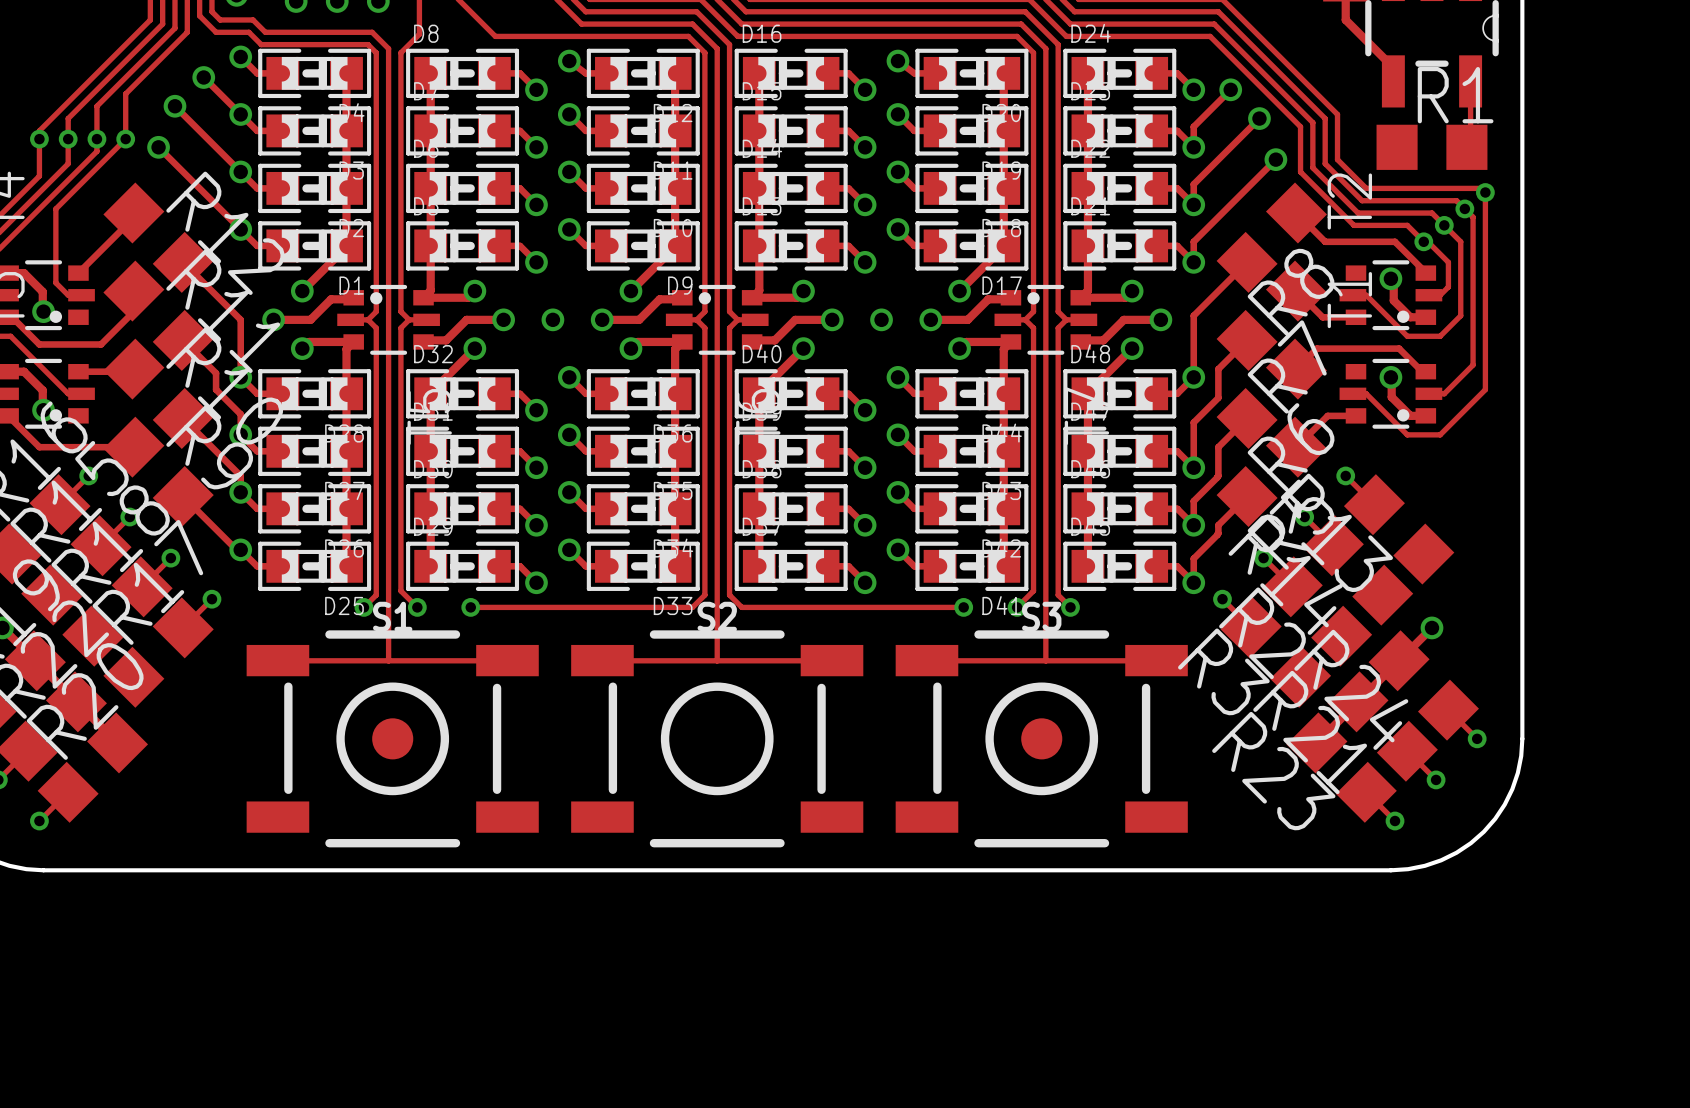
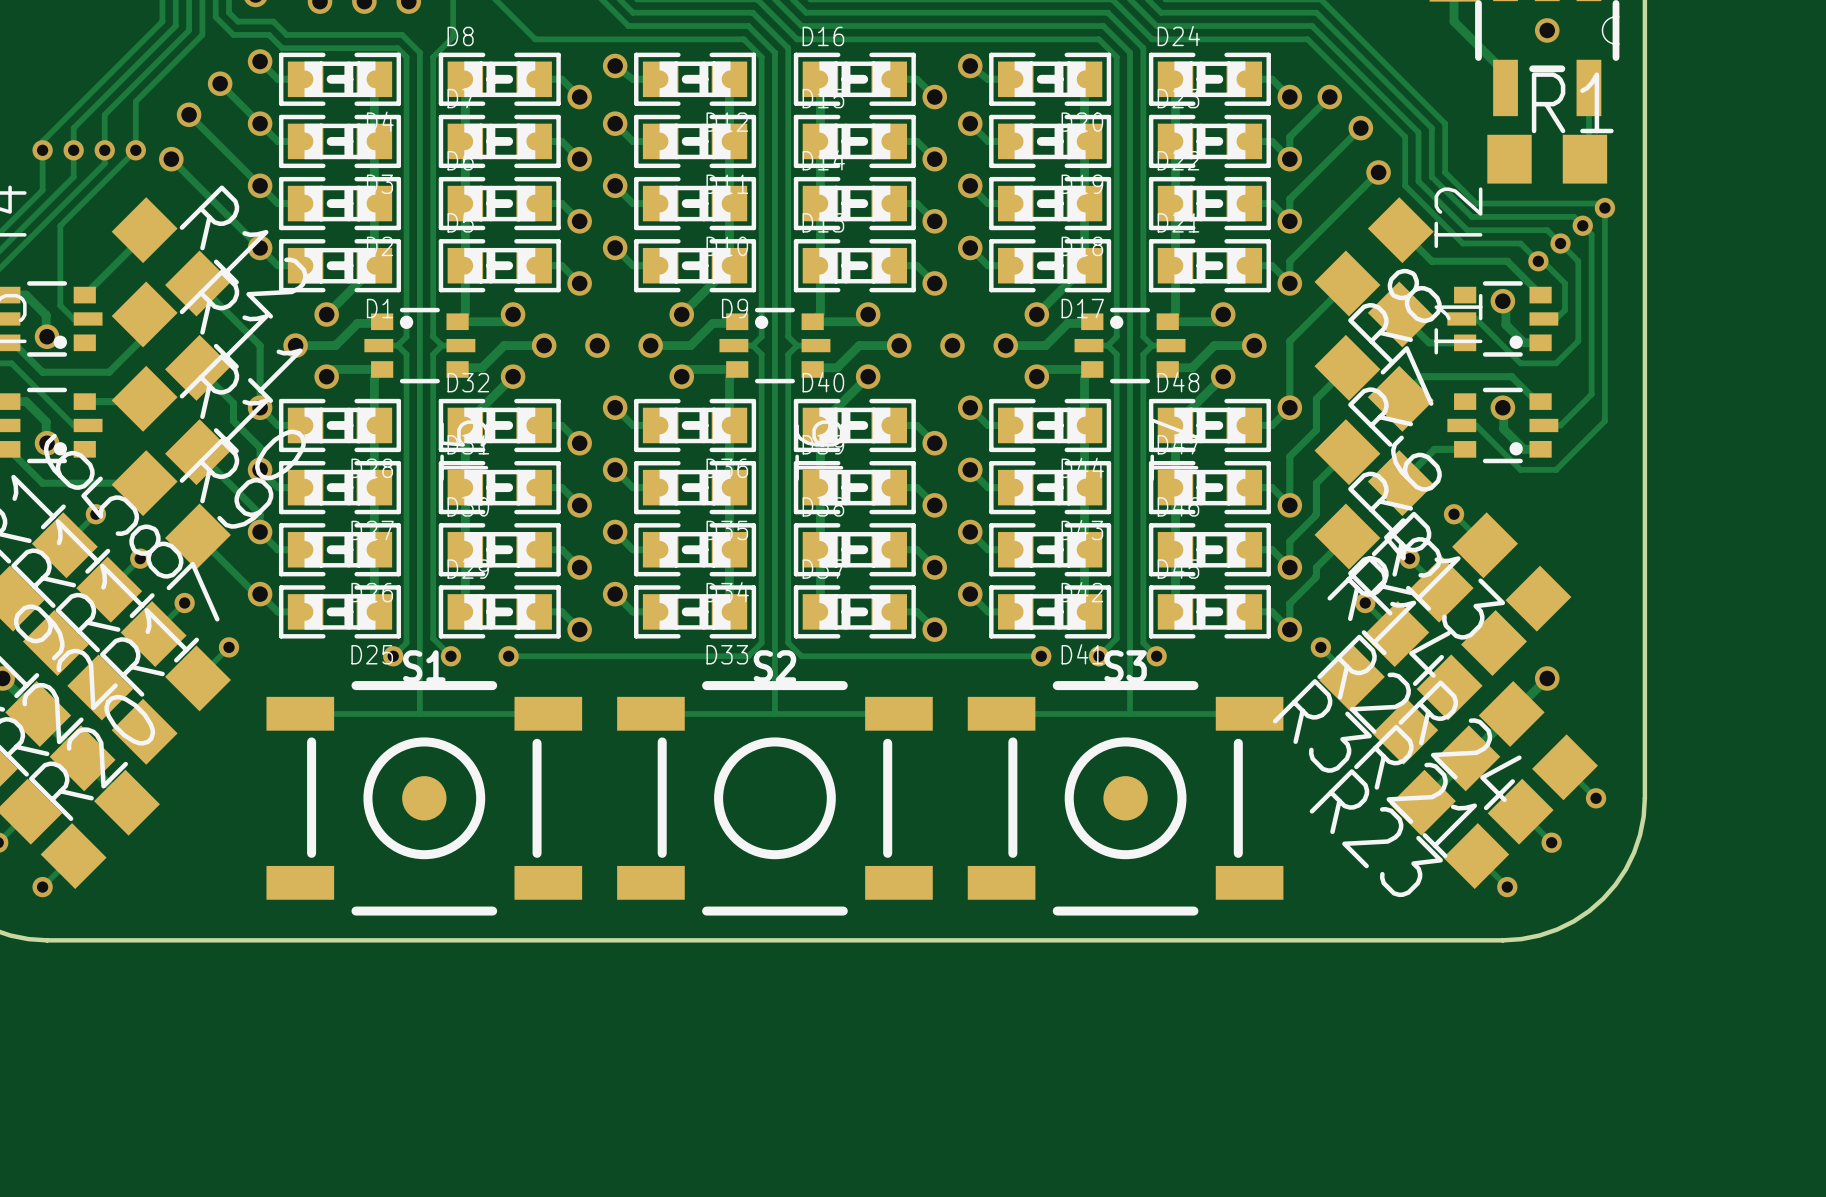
via: none -> (1547, 30)

